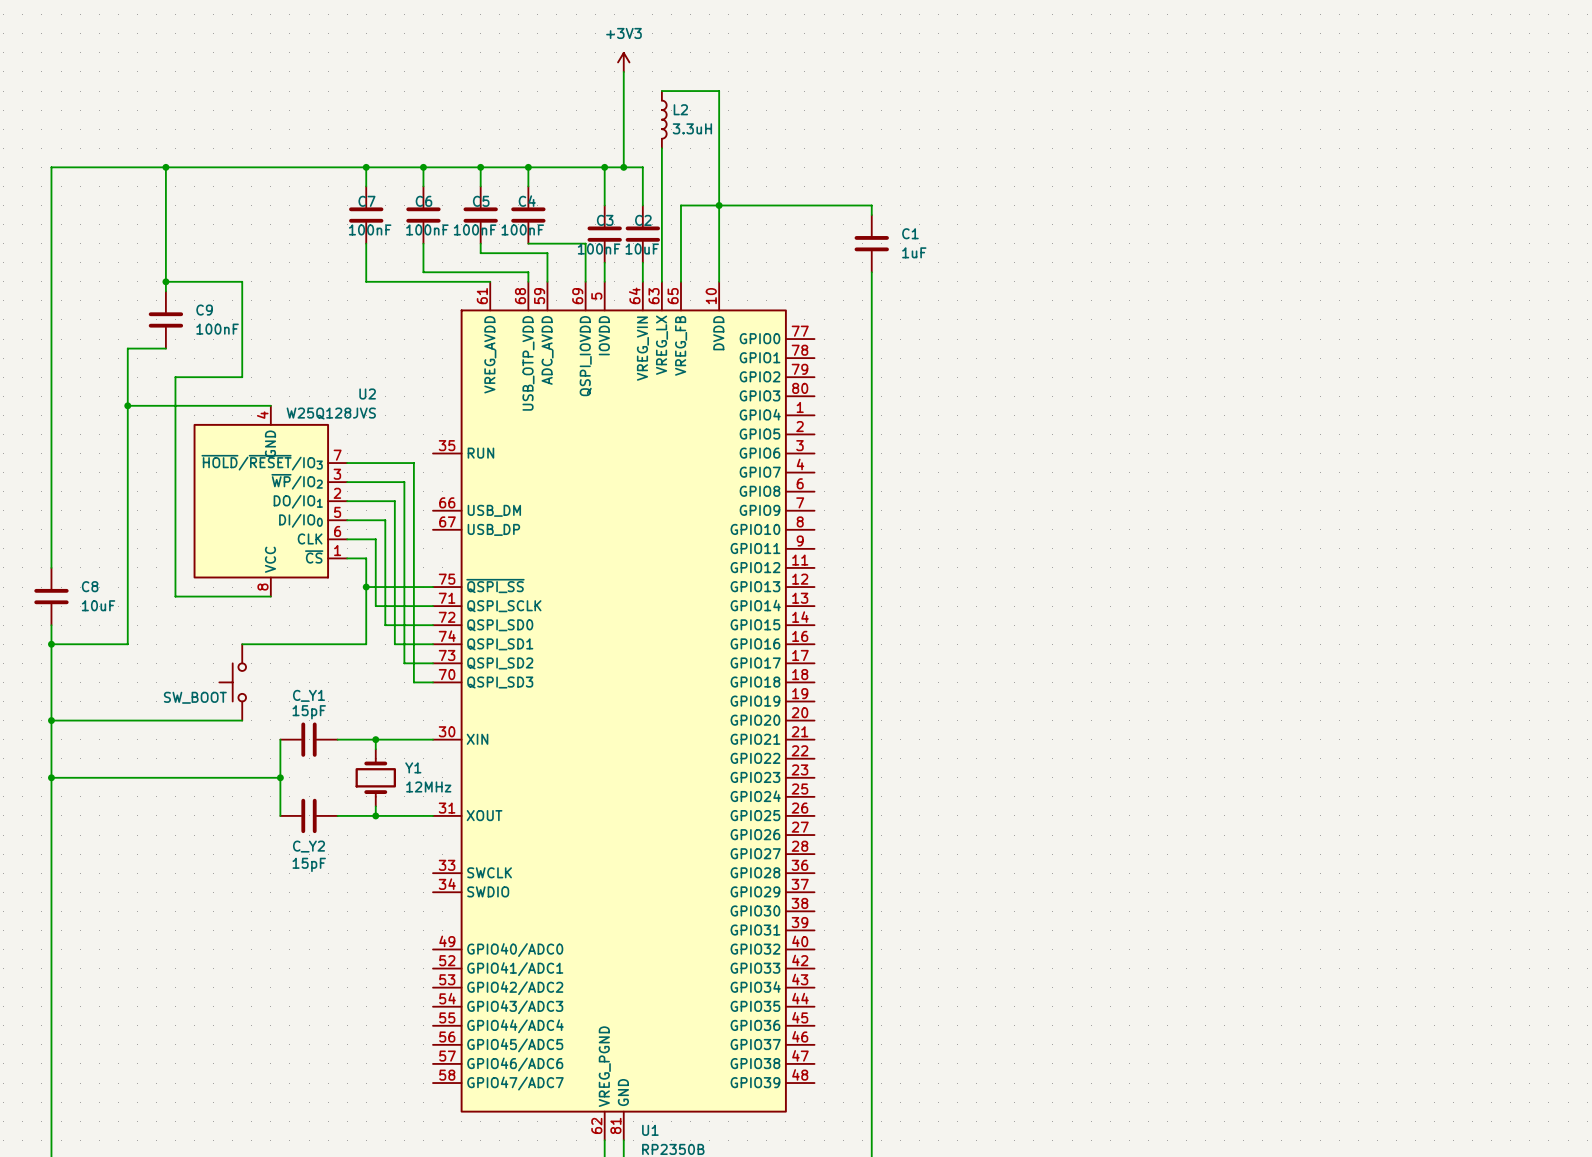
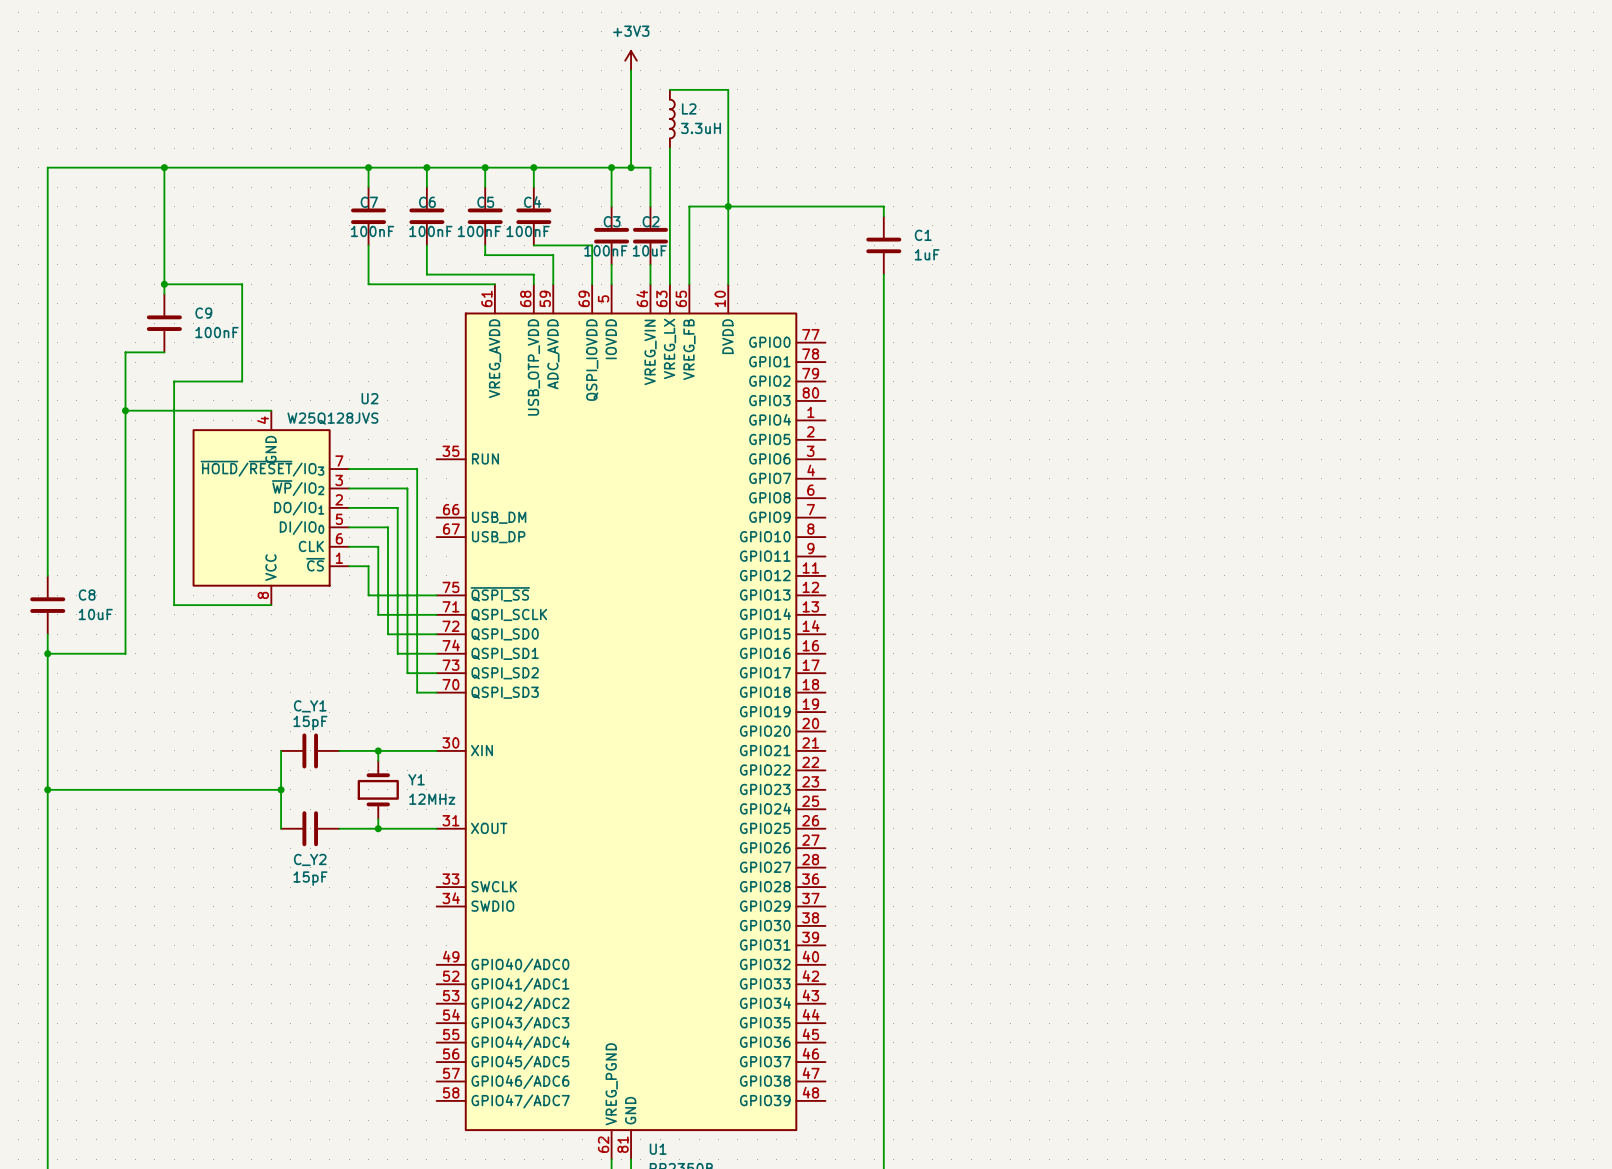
wire: (366, 587) (366, 644) (242, 644) -> none
junction: (366, 587) -> none
SW_BOOT: (232, 682) -> none
wire: (51, 720) (242, 720) -> none
junction: (51, 720) -> none

